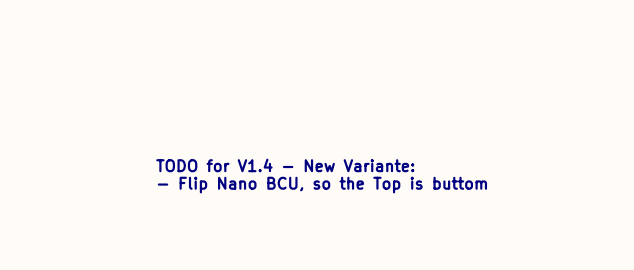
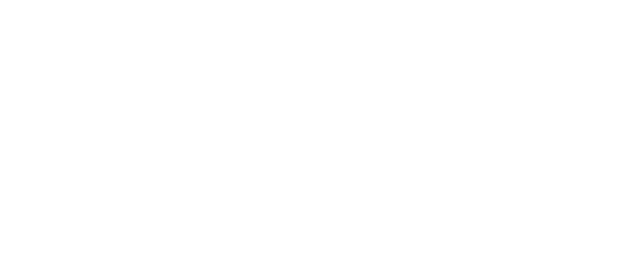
text: TODO for V1.4 - New Variante: (285, 165) -> none
text: - Flip Nano BCU, so the Top is buttom (322, 185) -> none

